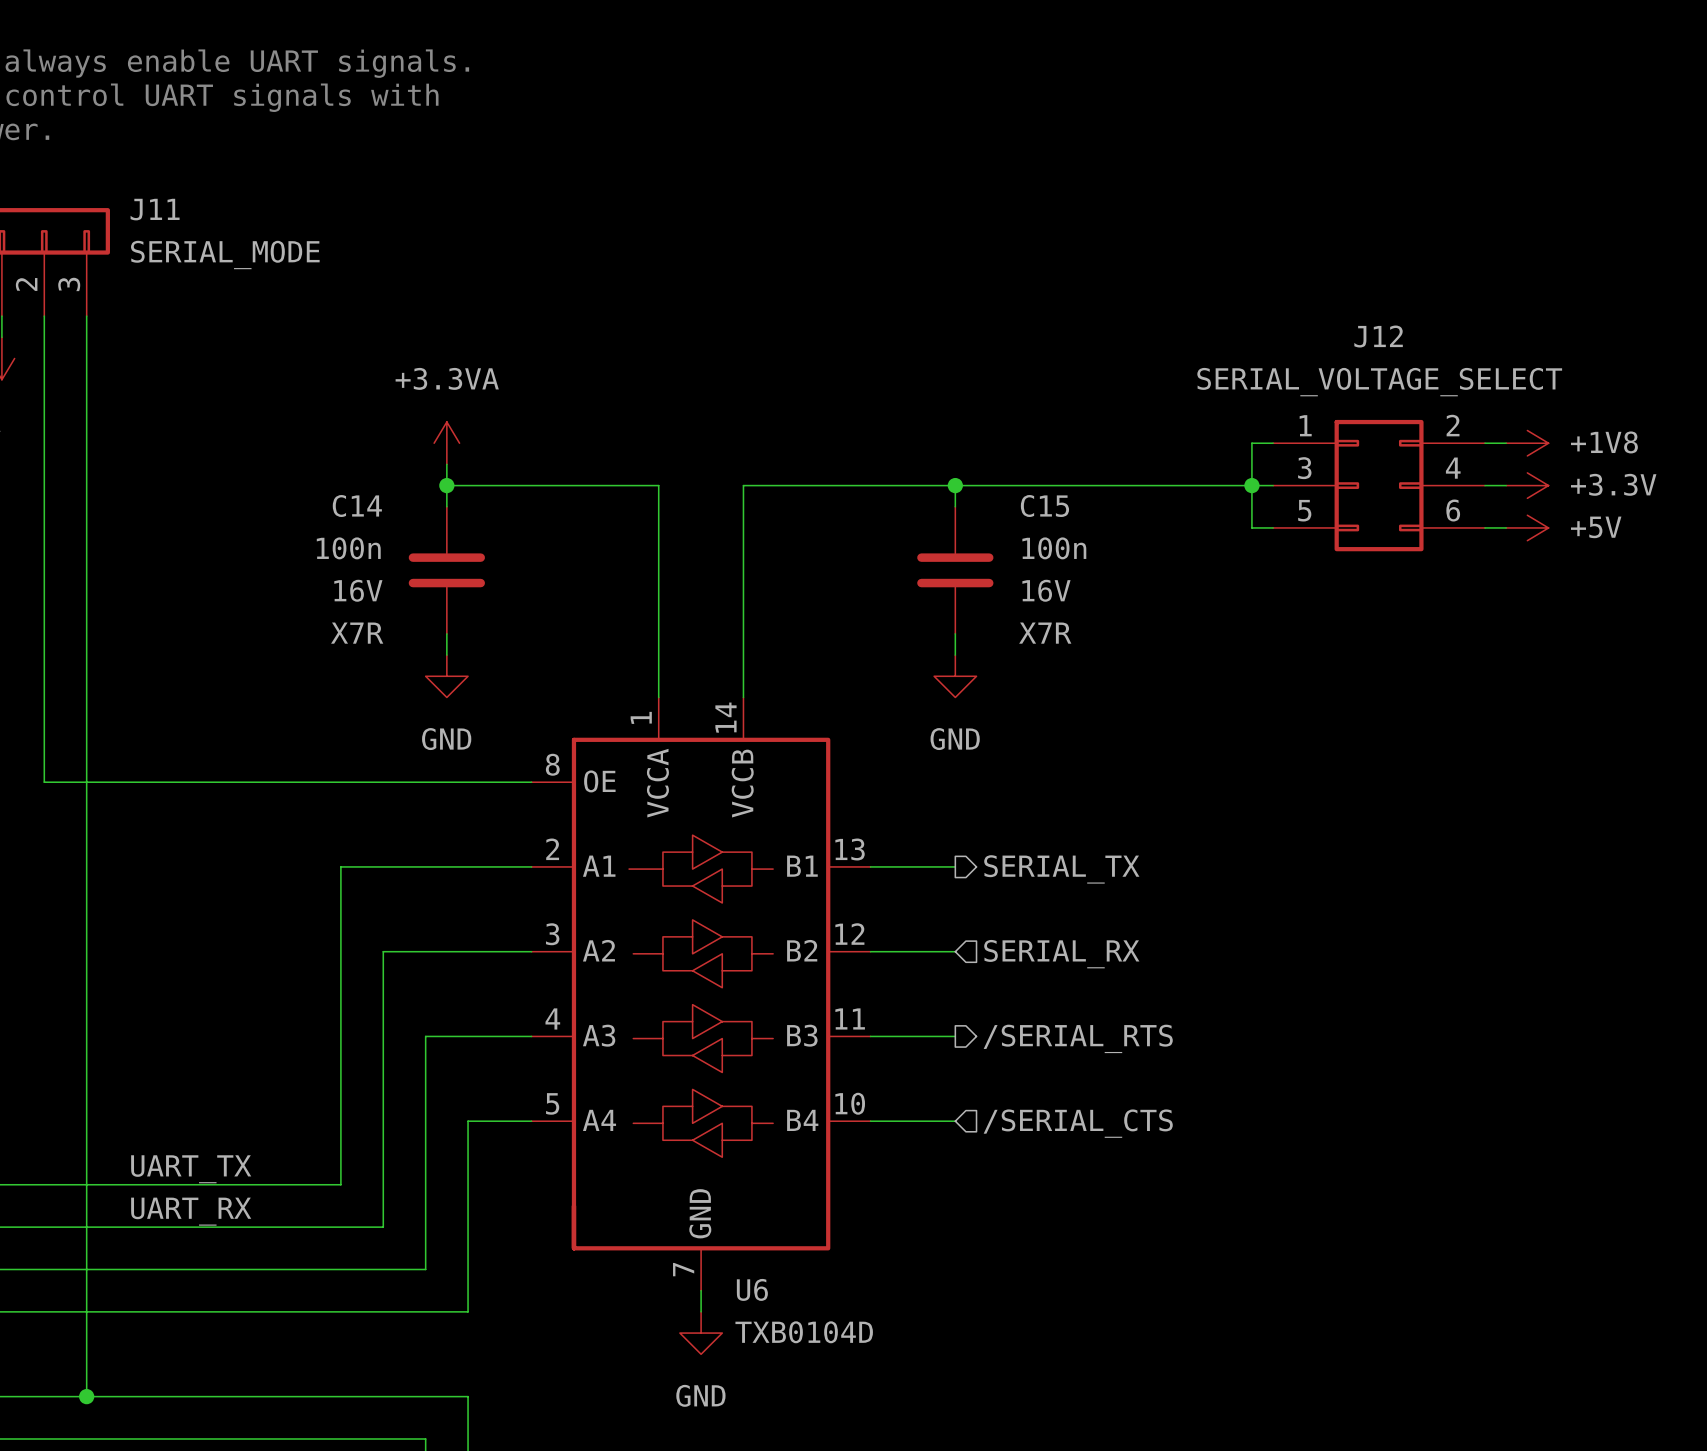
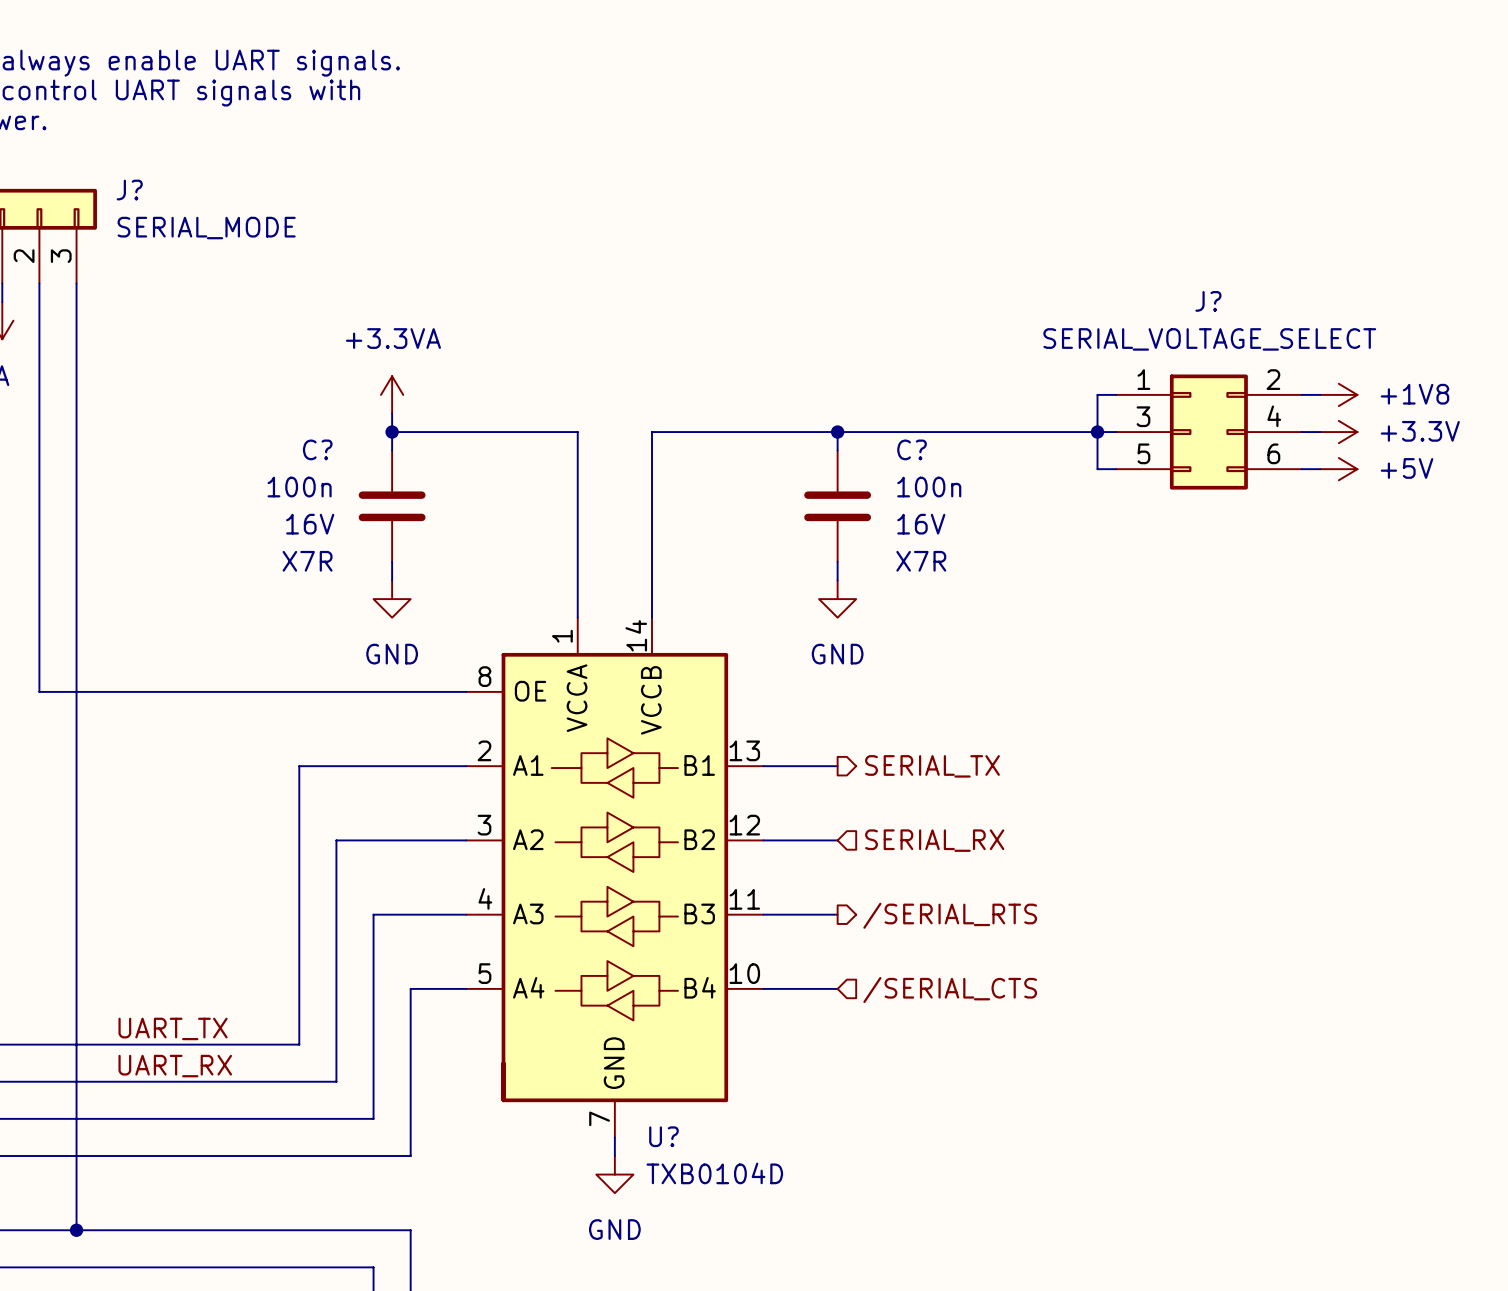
J11 name: J11 (155, 209) -> J? (129, 190)
J12 name: J12 (1378, 336) -> J? (1208, 301)
C14 name: C14 (357, 506) -> C? (317, 449)
C15 name: C15 (1044, 506) -> C? (912, 449)
U6 name: U6 (752, 1289) -> U? (663, 1136)

